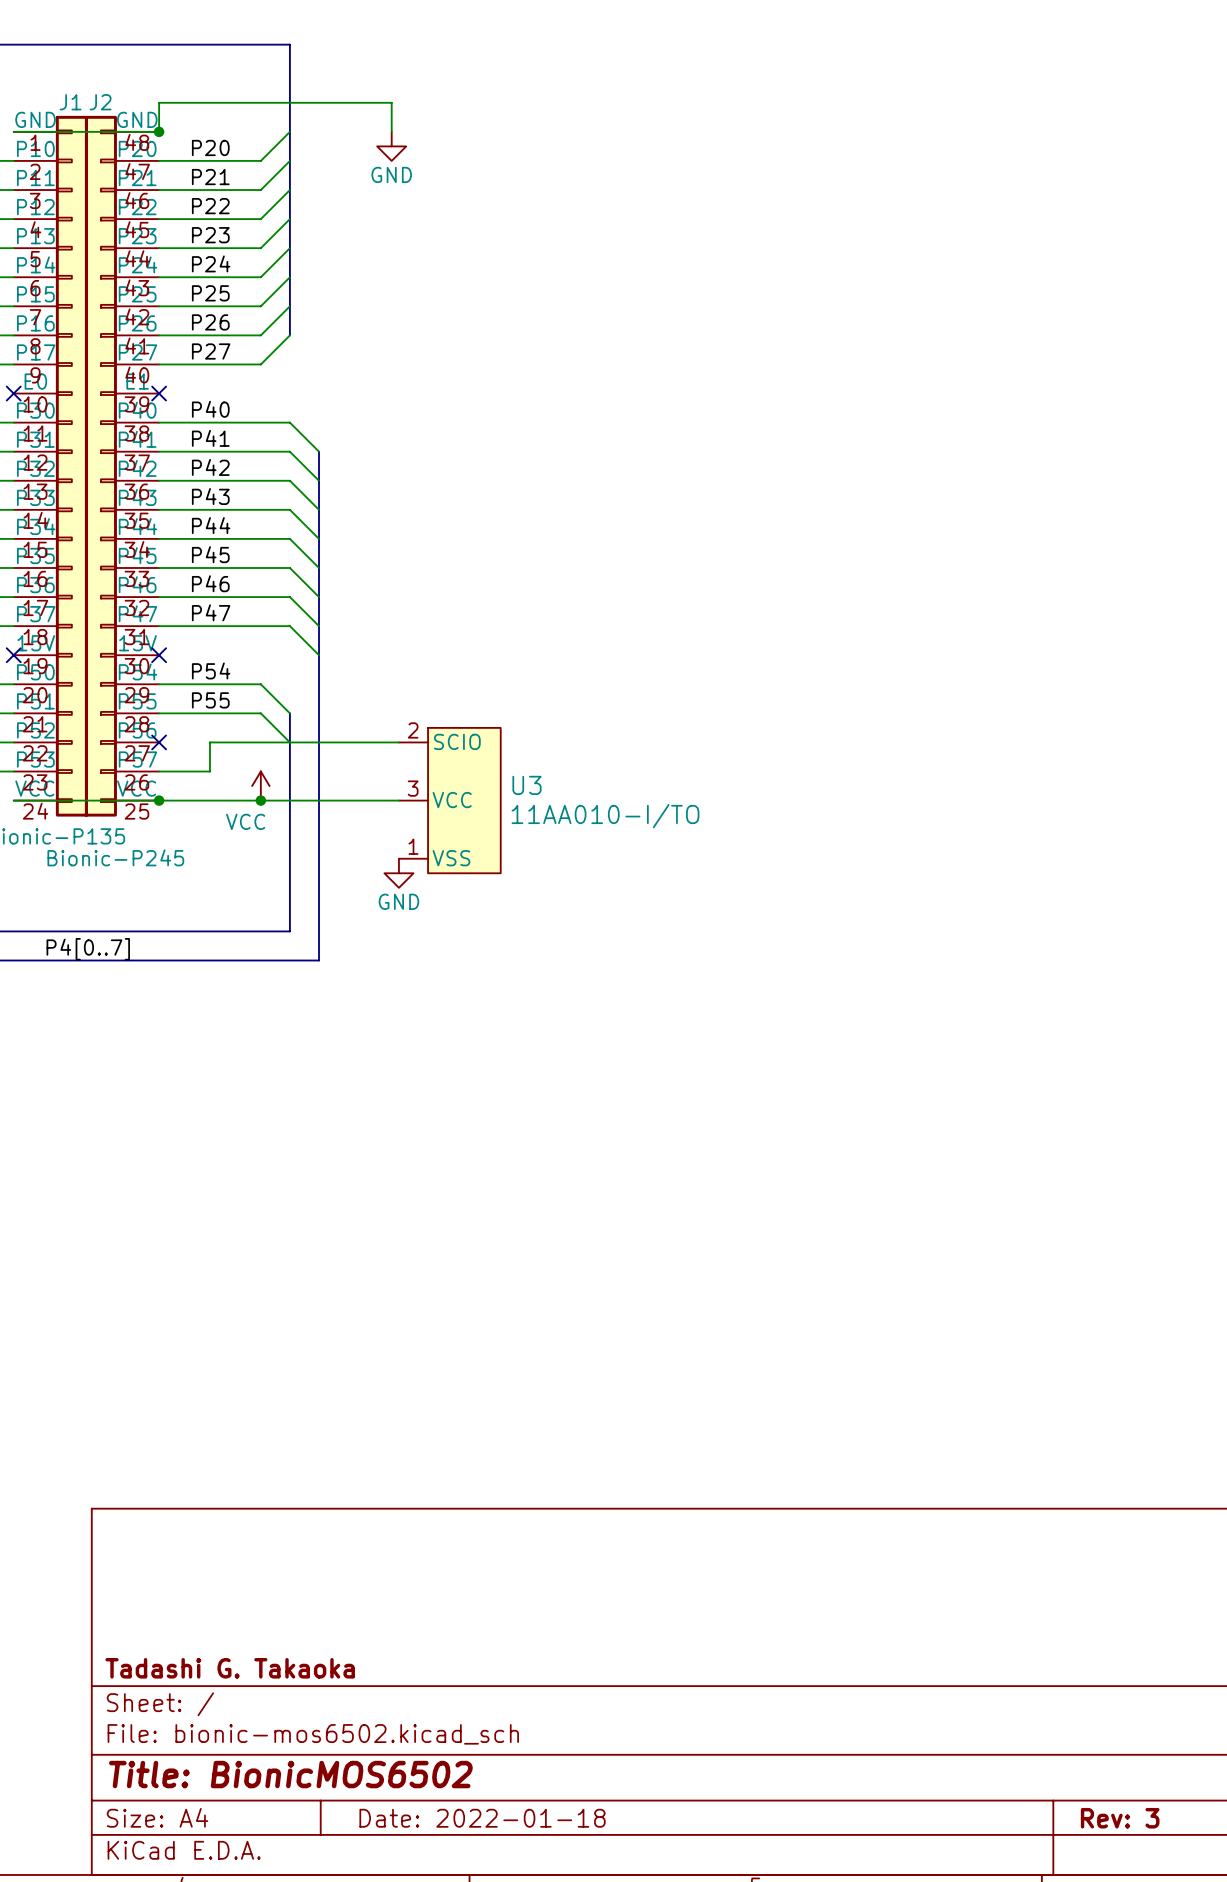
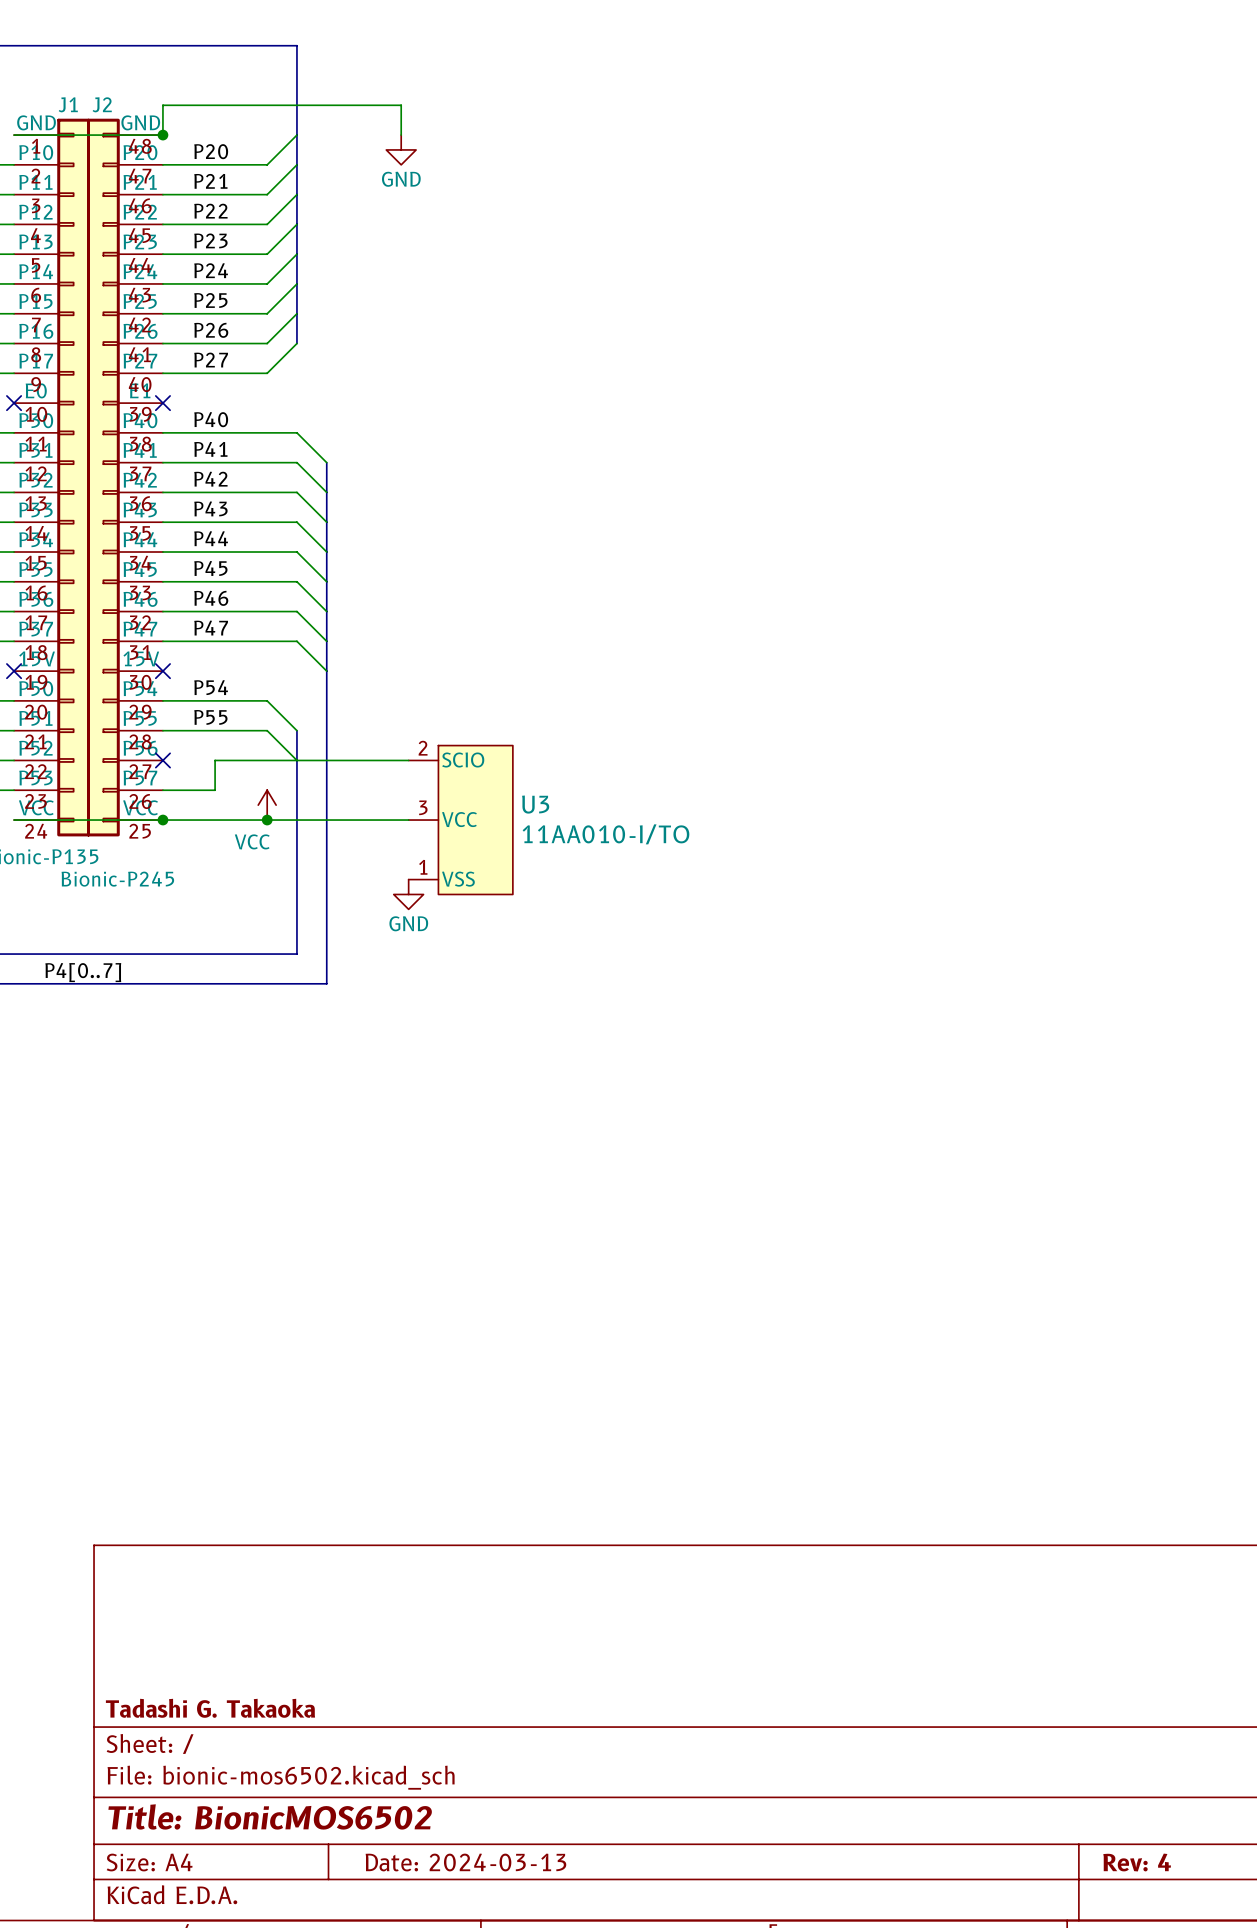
title block: Date: 2022-01-18 (482, 1818) -> Date: 2024-03-13 (465, 1862)
title block: Rev: 3 (1120, 1818) -> Rev: 4 (1137, 1862)

